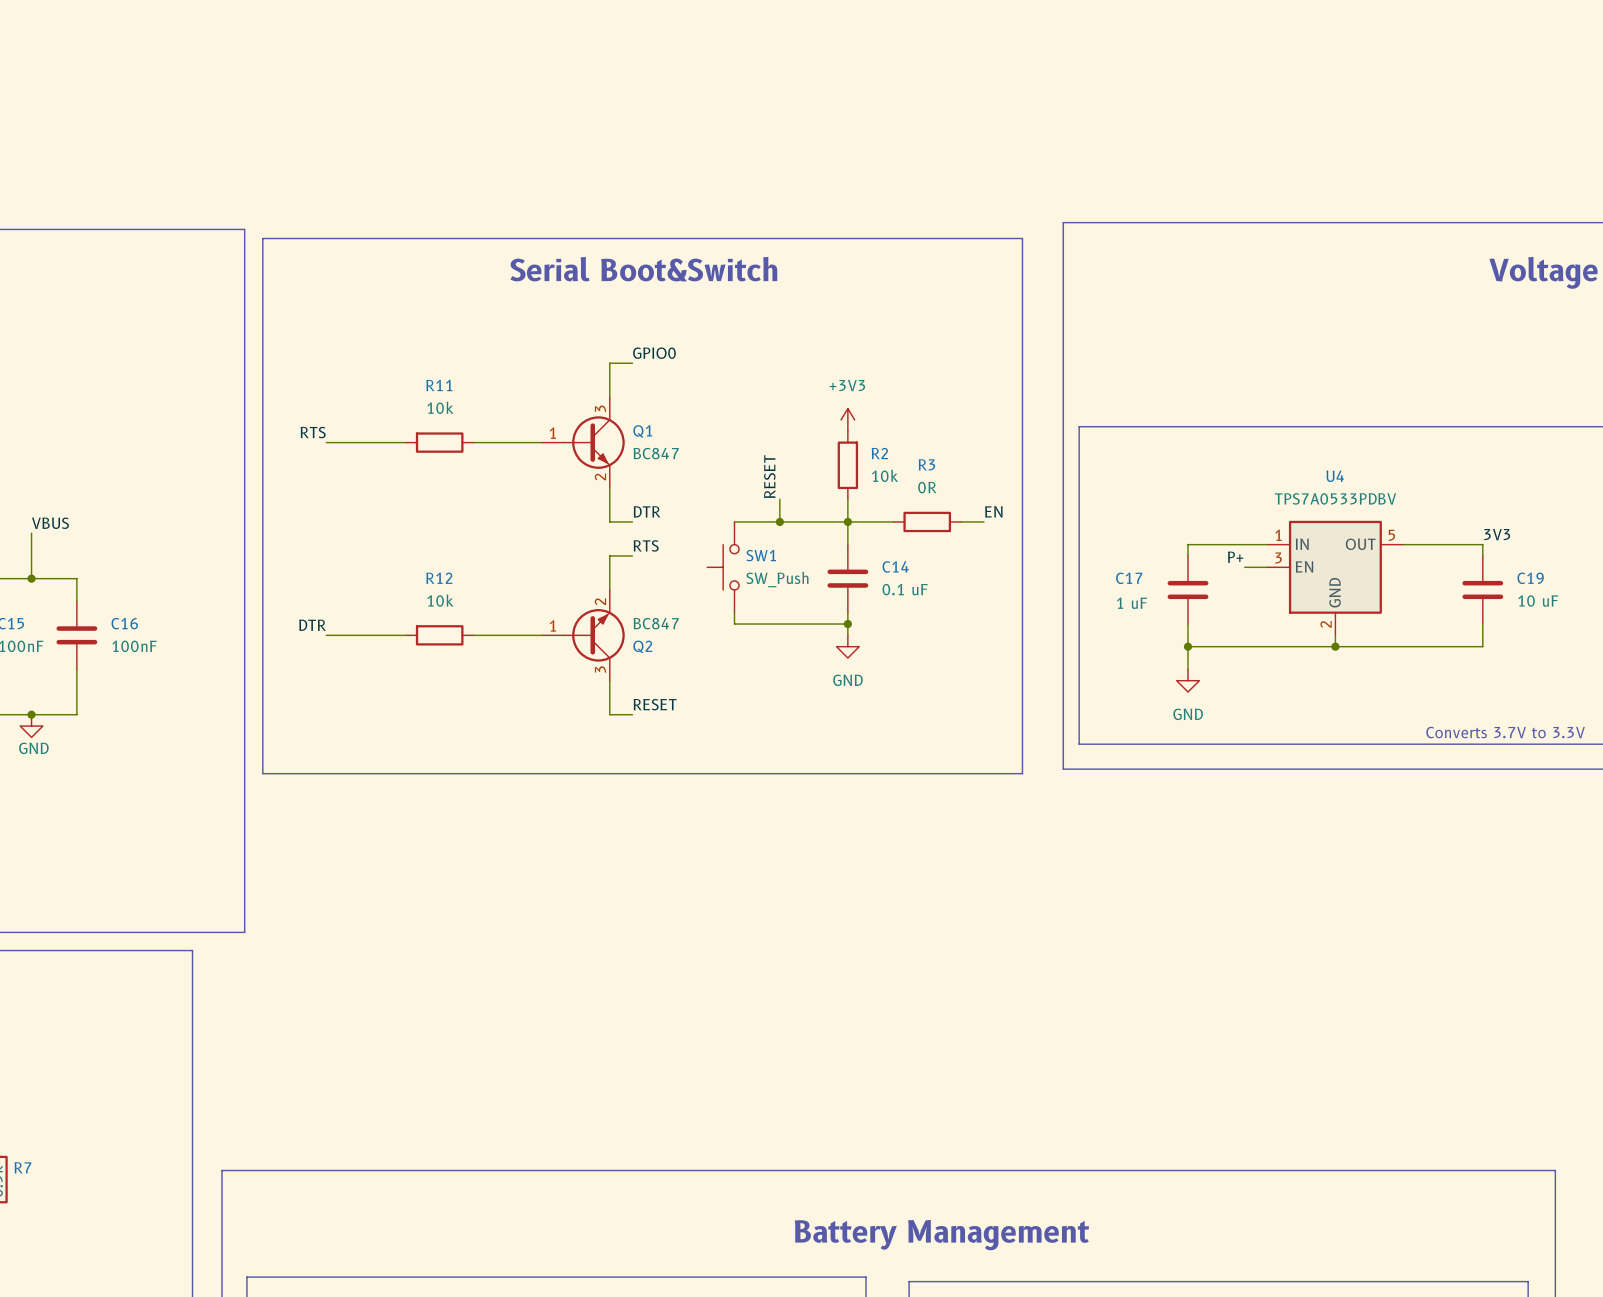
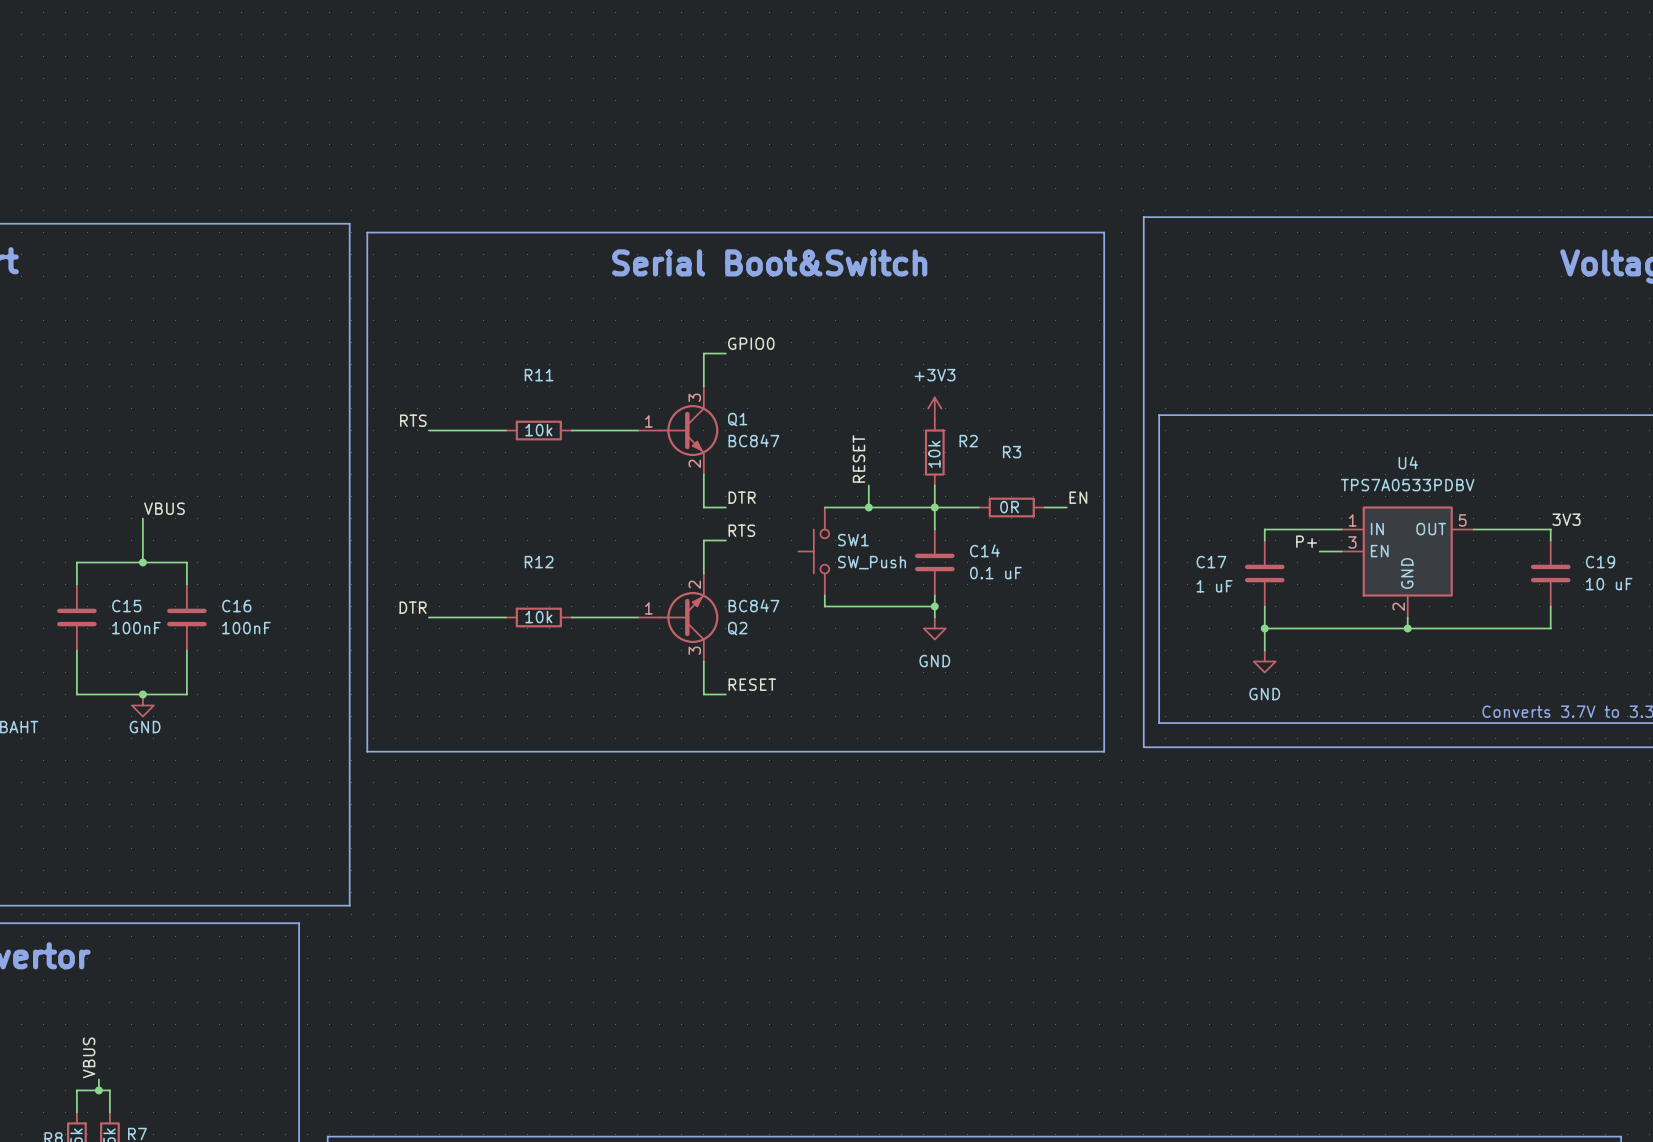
R11 value position: 10k (440, 407) -> 10k (538, 430)
R2 value rotation: 0° (885, 475) -> 90° counterclockwise (934, 454)
R2 value position: 10k (885, 475) -> 10k (934, 454)
R3 value position: 0R (927, 487) -> 0R (1009, 507)
R12 value position: 10k (440, 600) -> 10k (538, 617)

